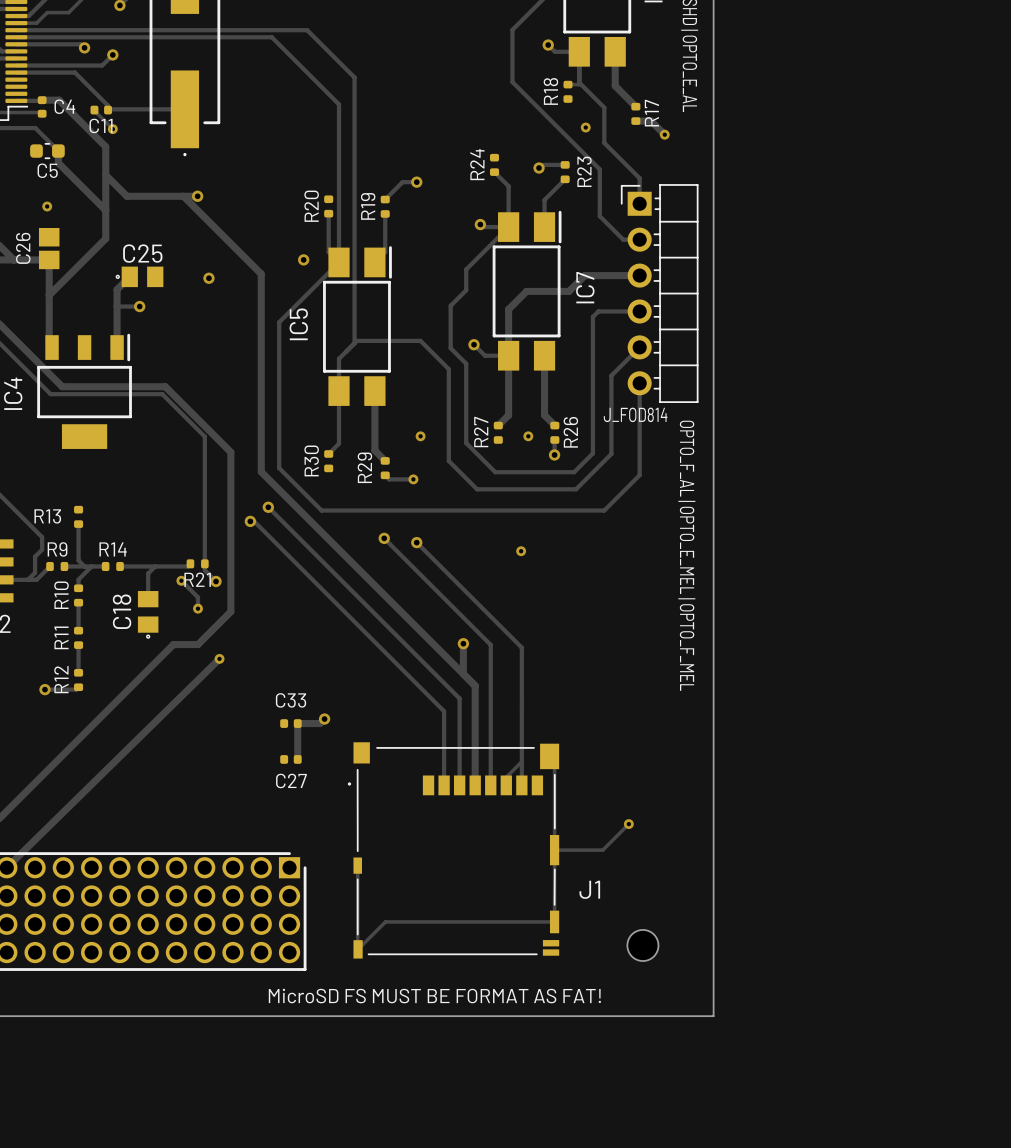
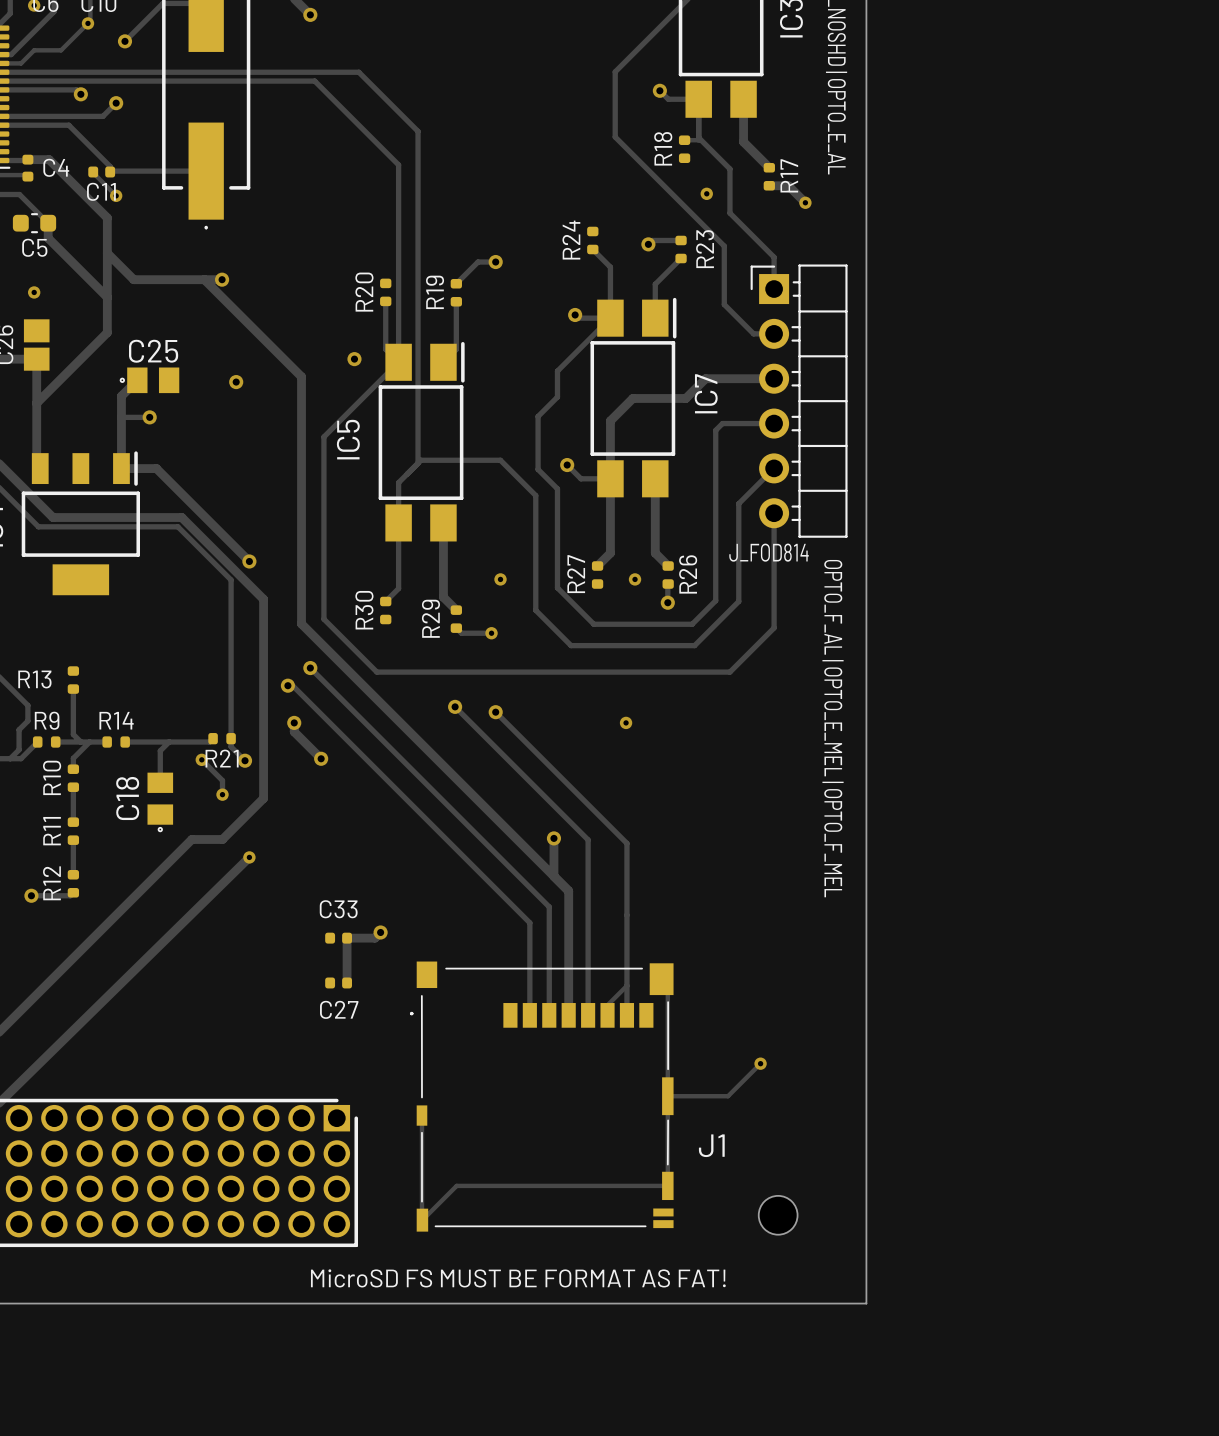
track: none -> (121, 468) (156, 468) (249, 561)
via: none -> (249, 561)
track: none -> (294, 722) (294, 731) (321, 758)
via: none -> (294, 722)
via: none -> (321, 758)

